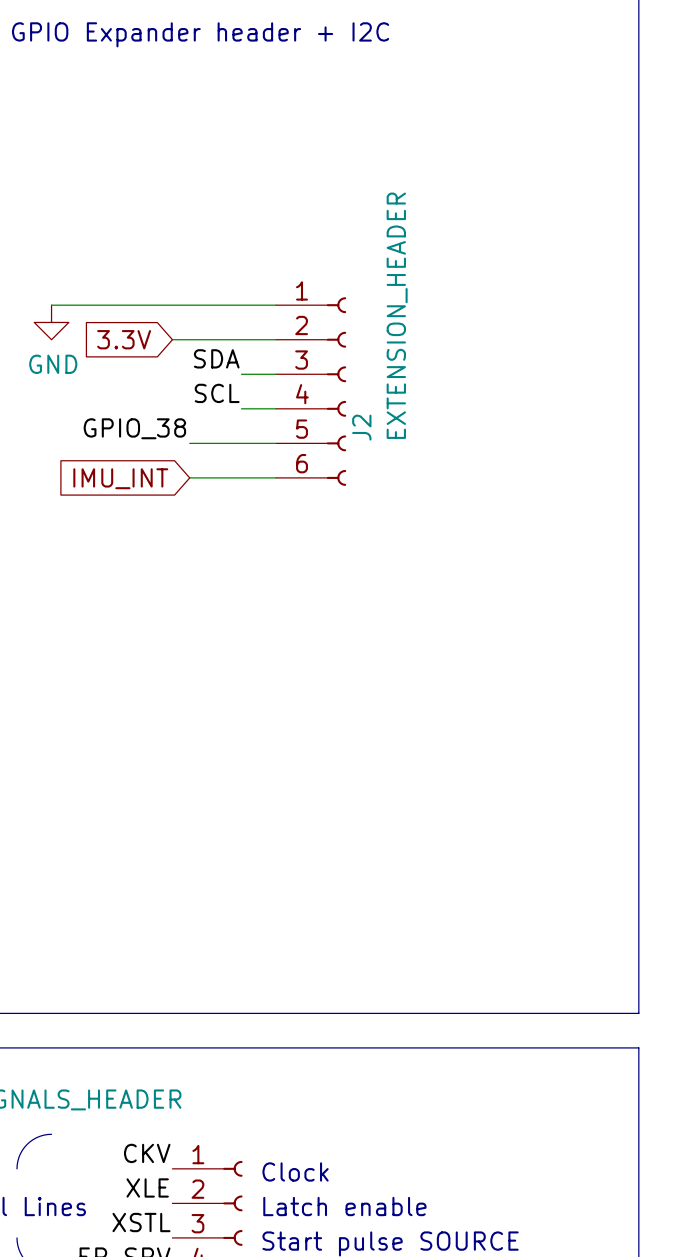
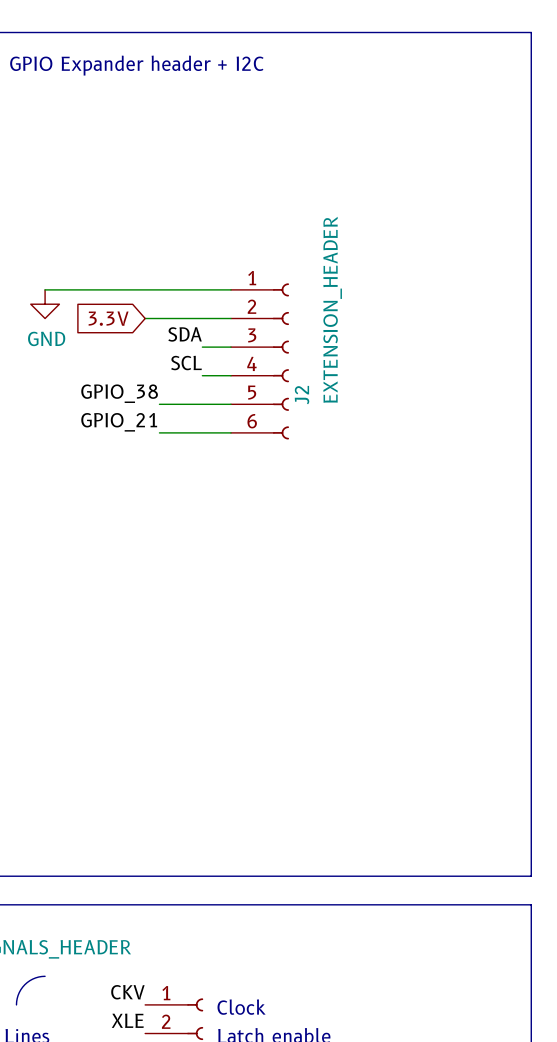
label: none -> GPIO_21 (119, 422)
global label: IMU_INT (120, 478) -> none

